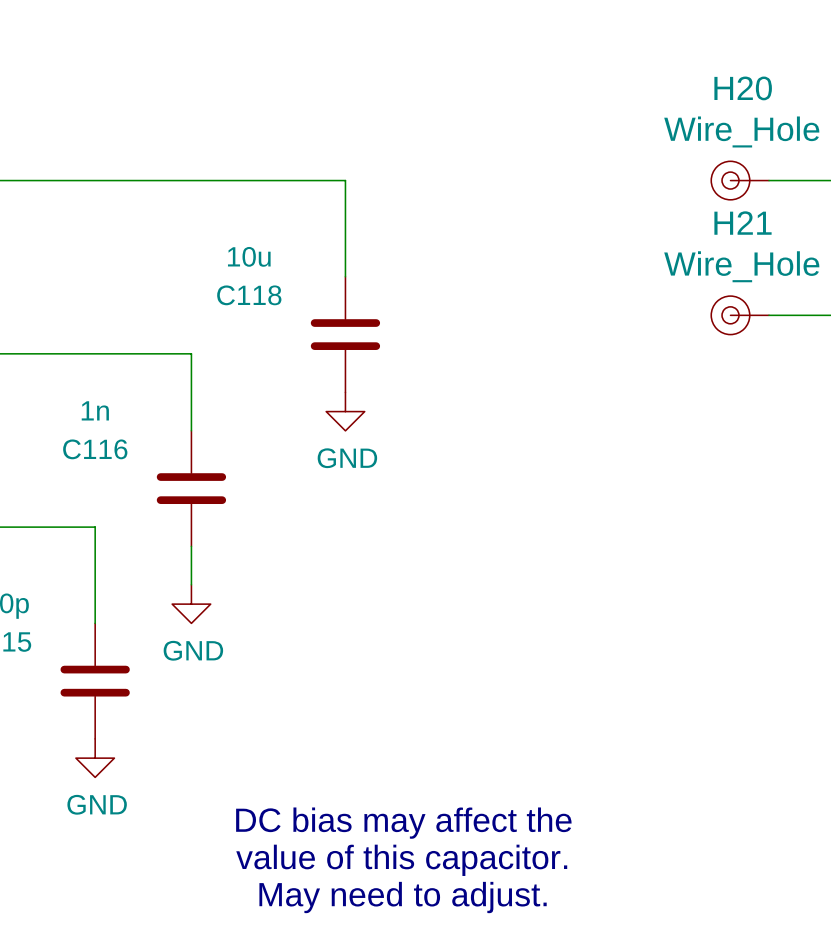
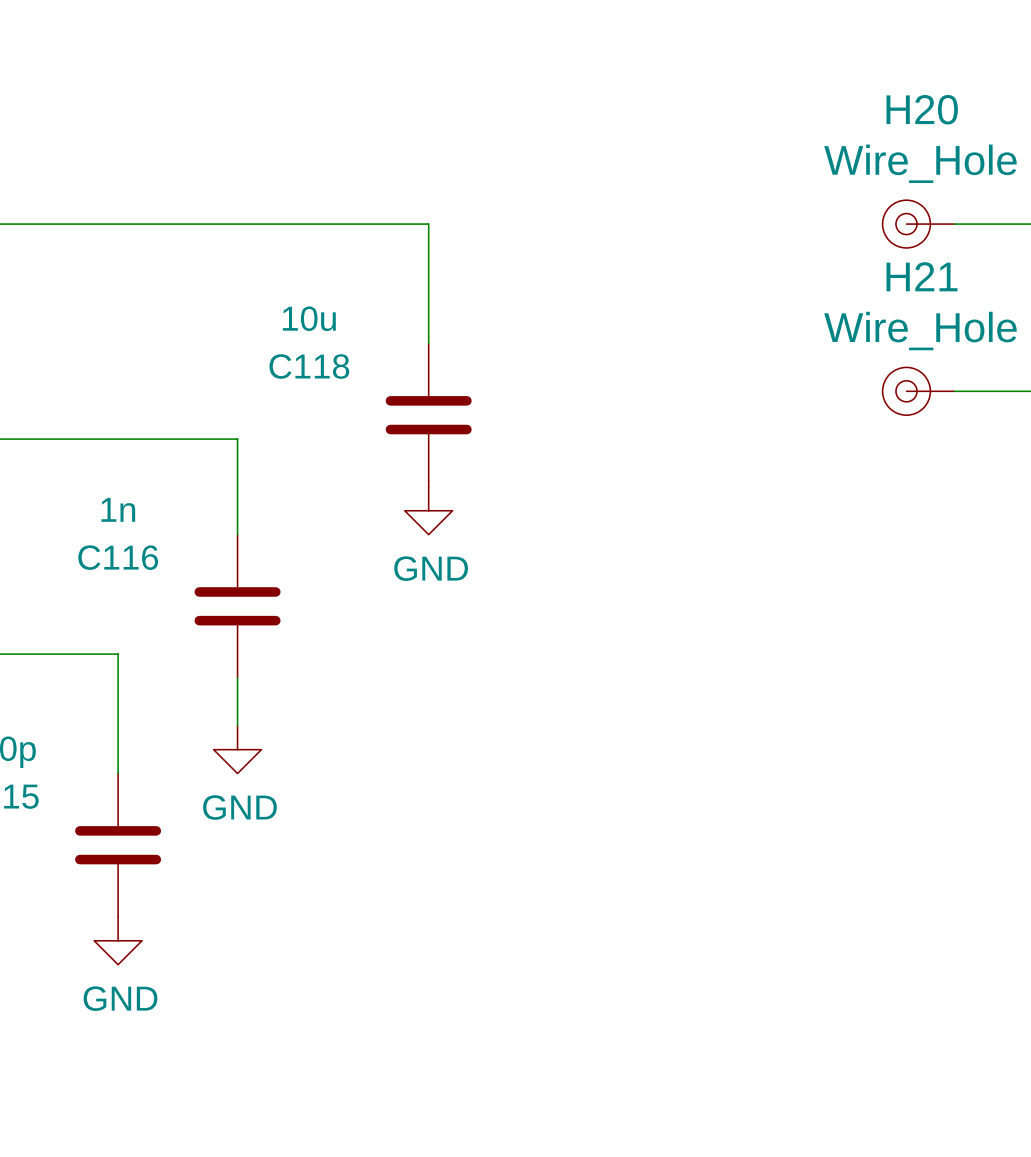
text: DC bias may affect the (403, 823) -> none
text: value of this capacitor. (401, 860) -> none
text: May need to adjust. (403, 897) -> none

